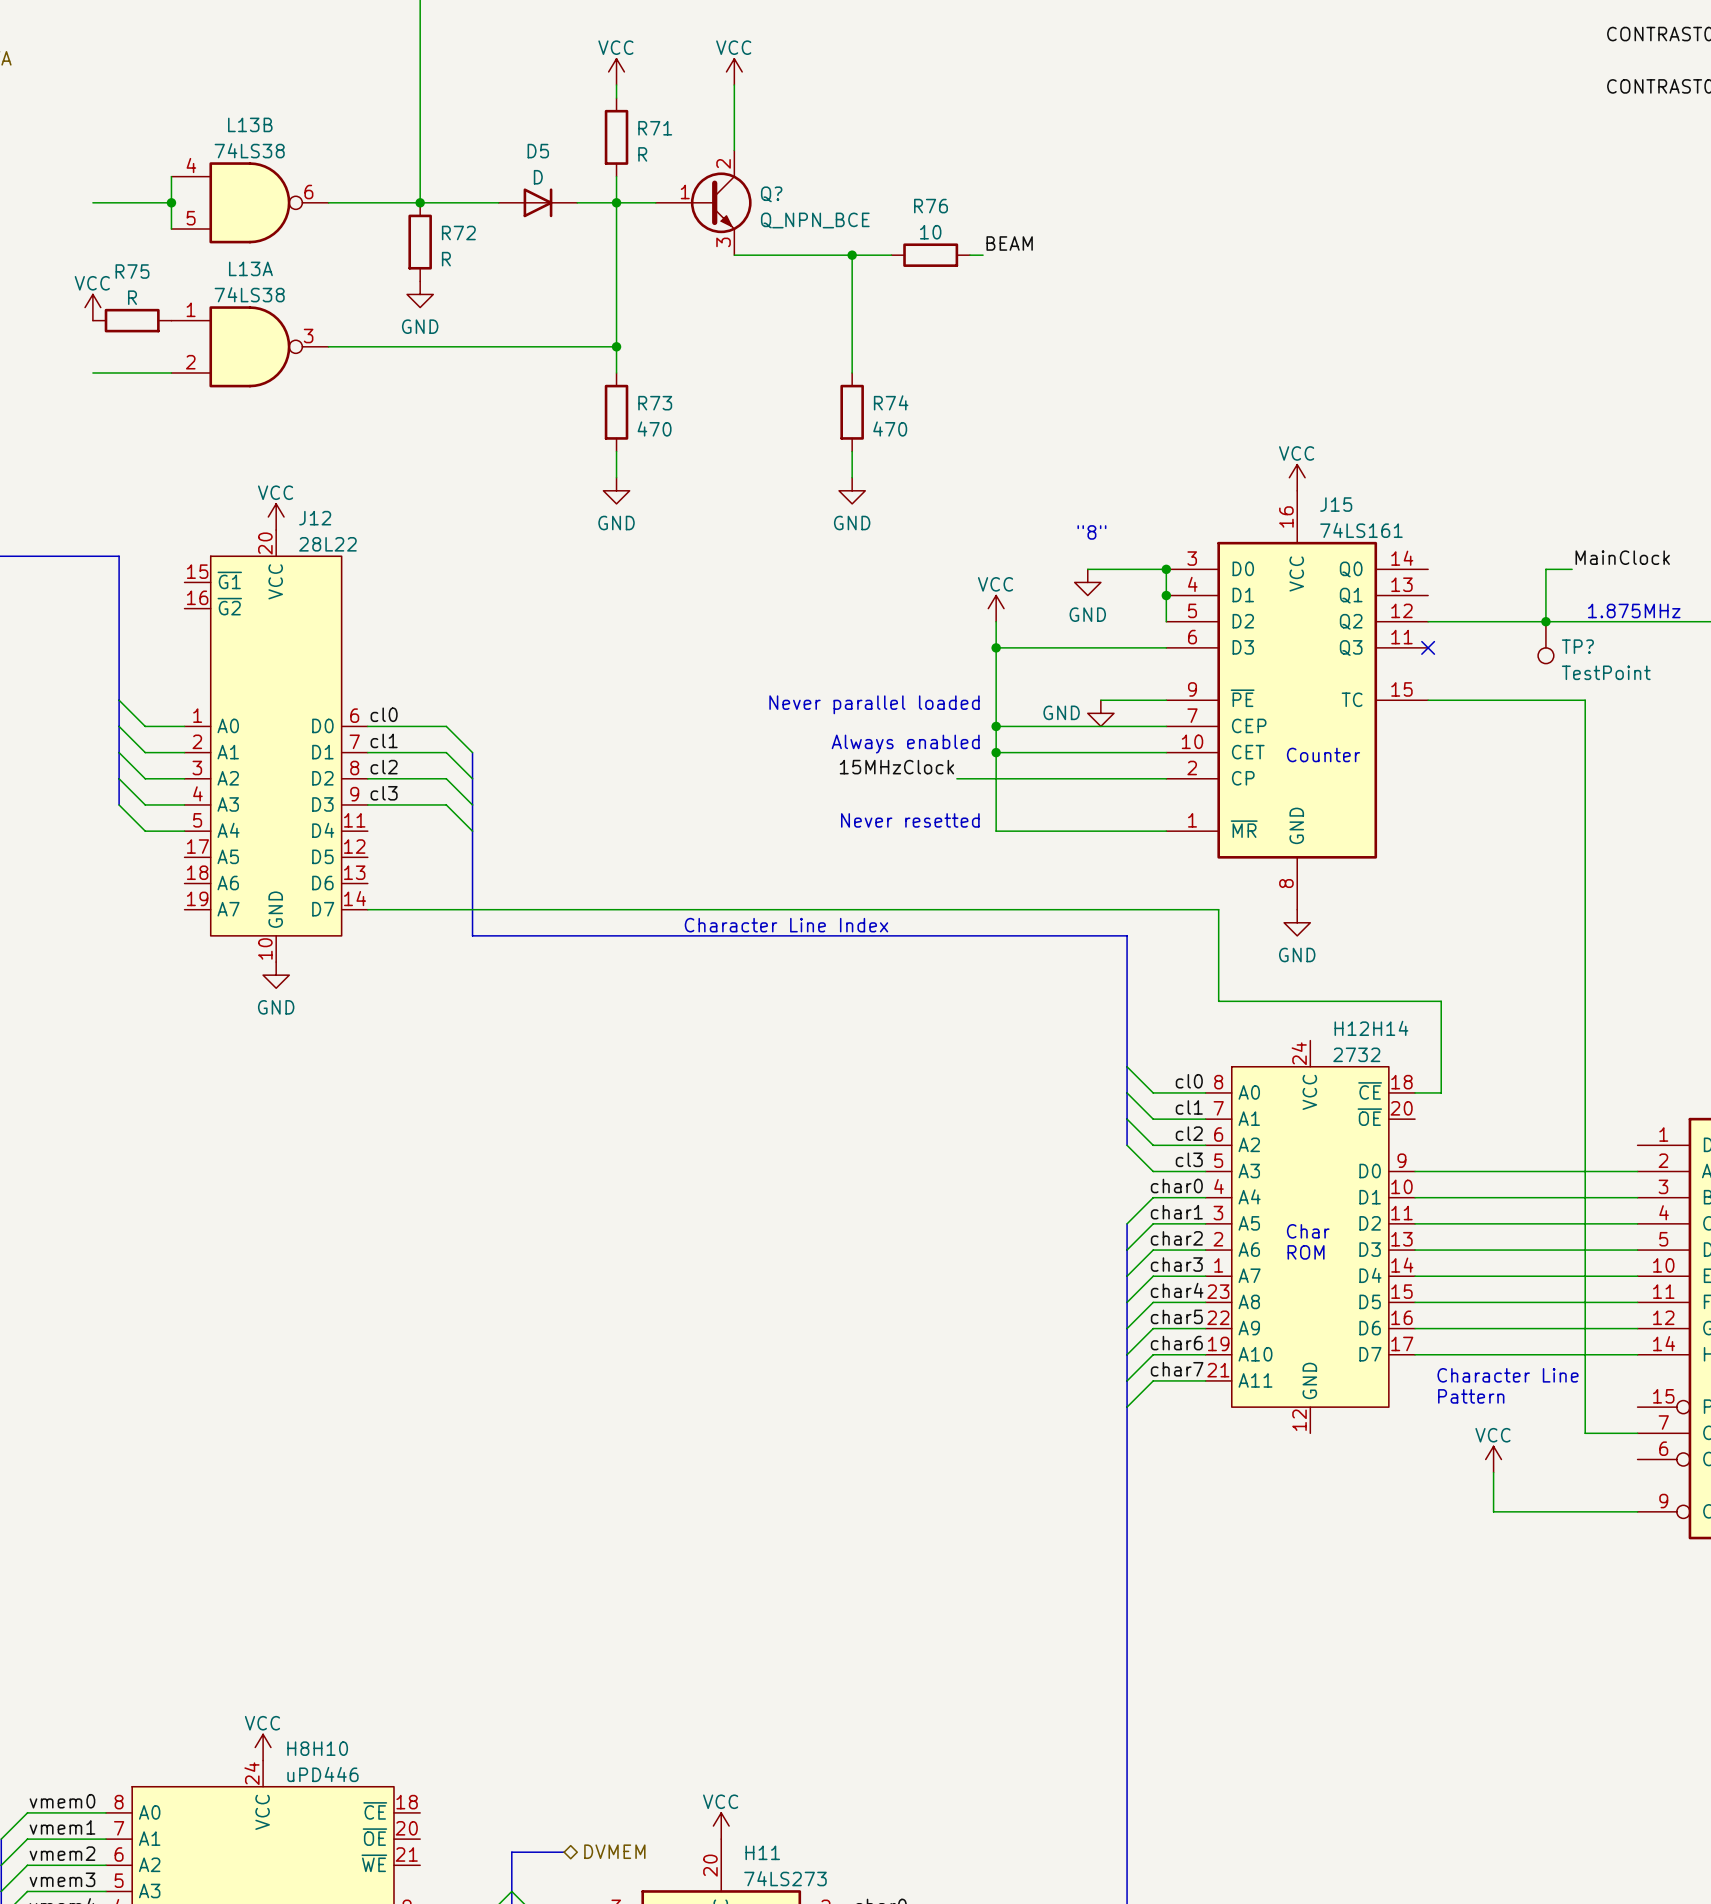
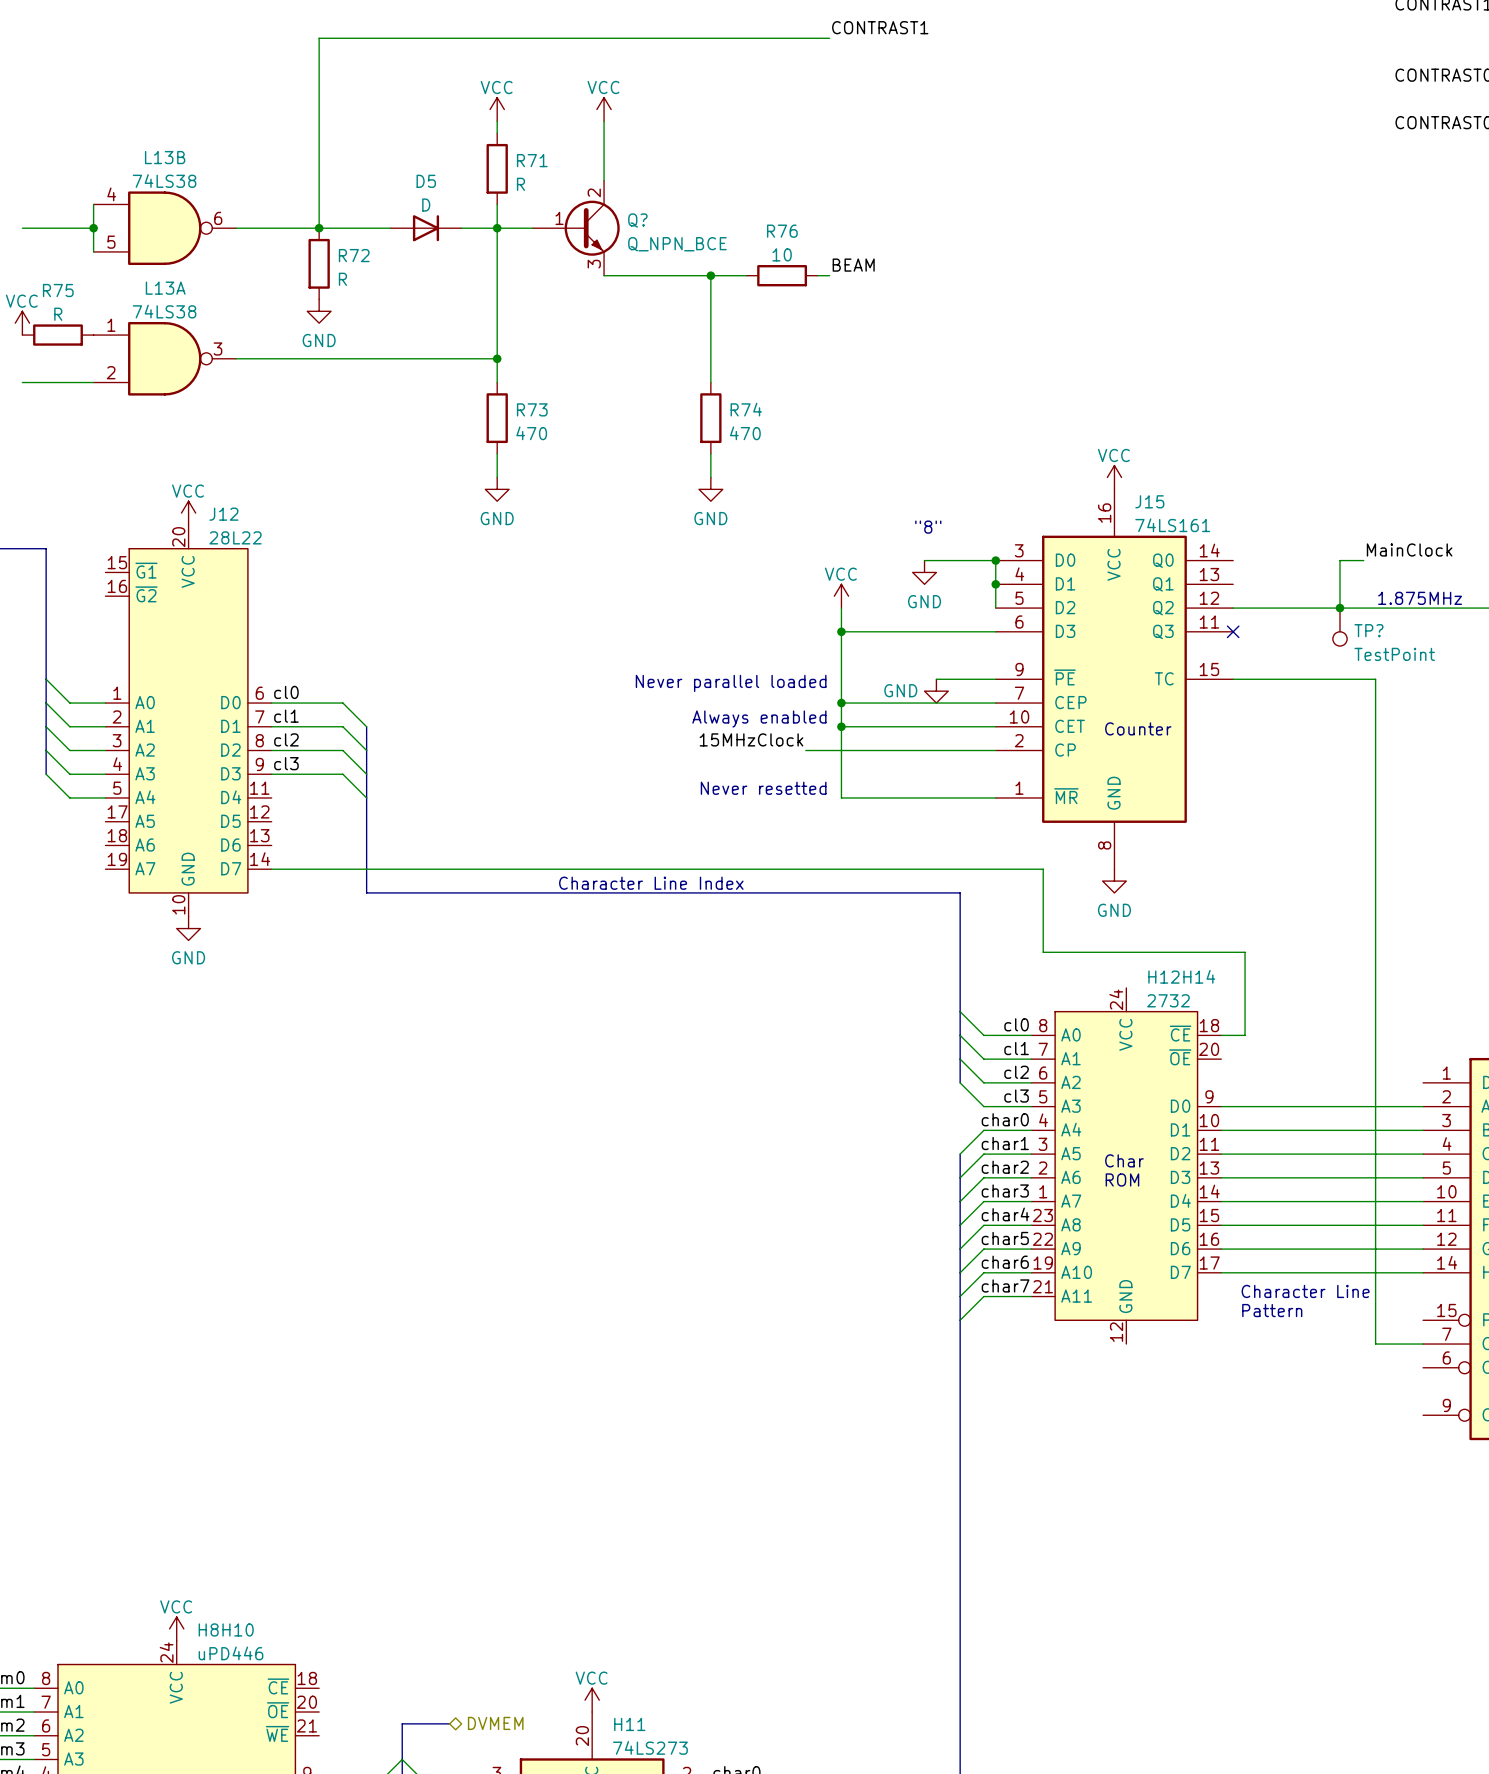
power symbol: VCC (1493, 1459) -> none
wire: (1493, 1472) (1493, 1511) (1637, 1511) -> none

